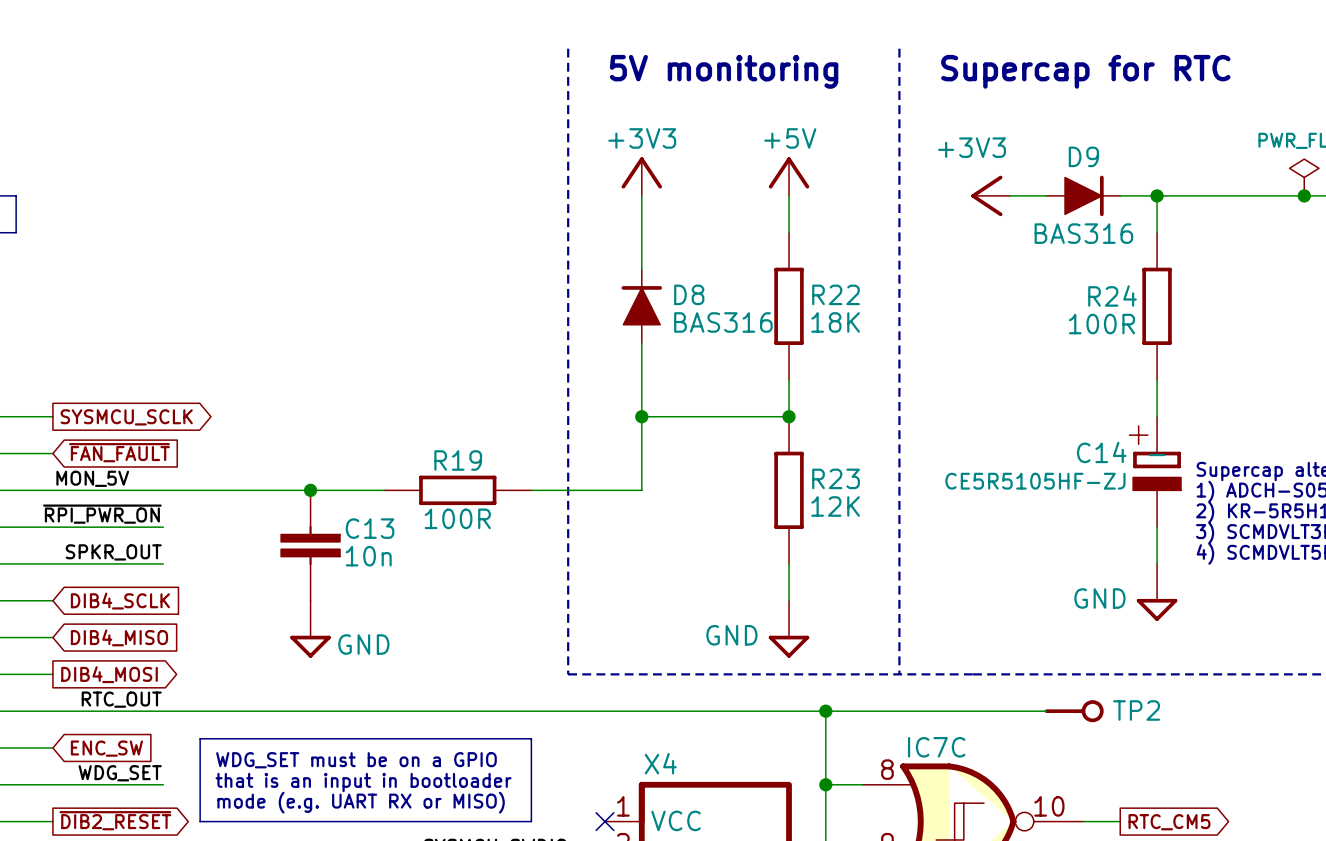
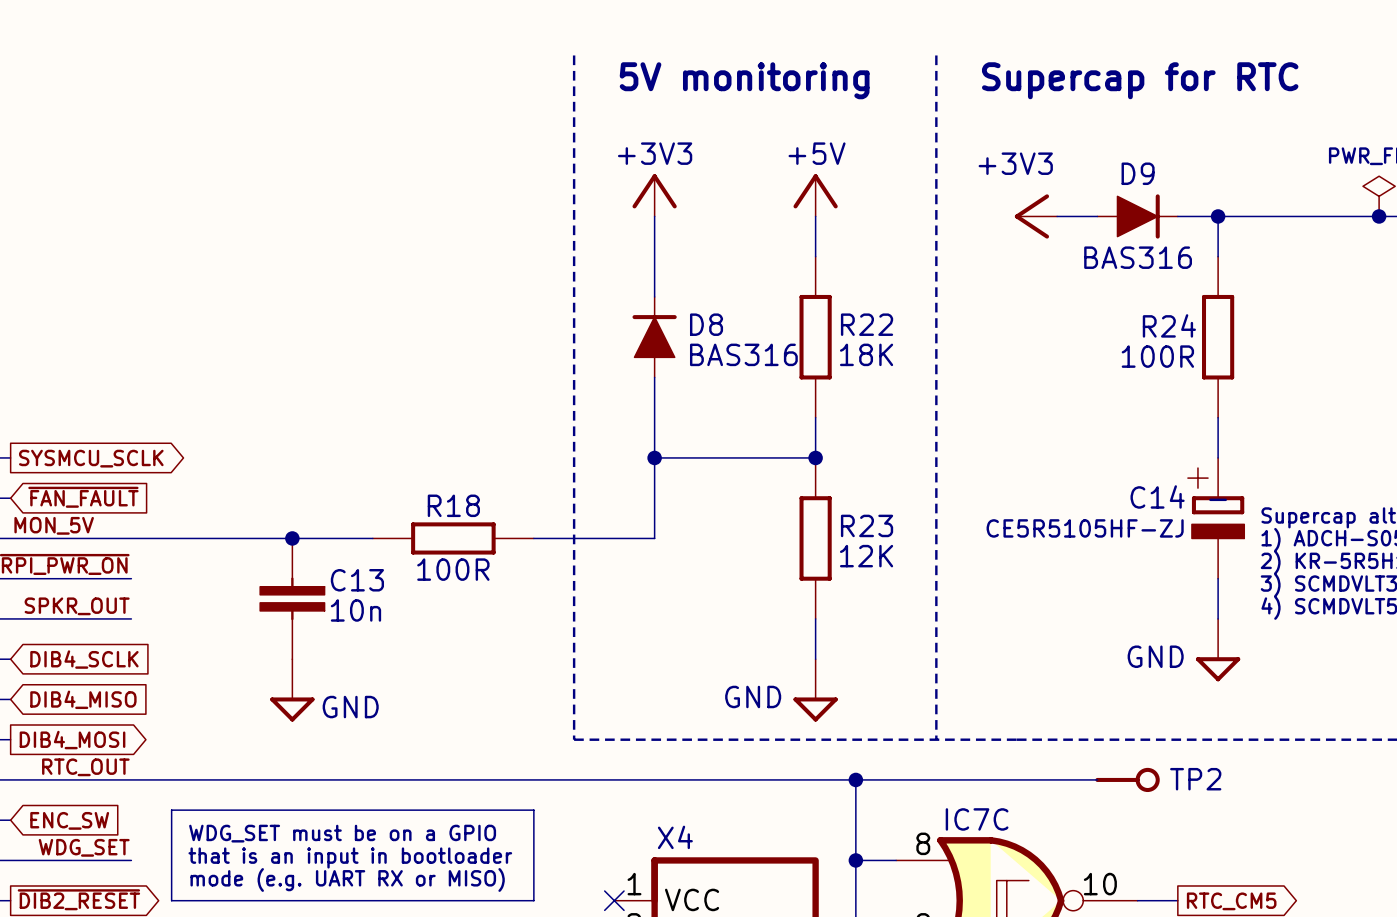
R19 name: R19 (458, 460) -> R18 (453, 505)

